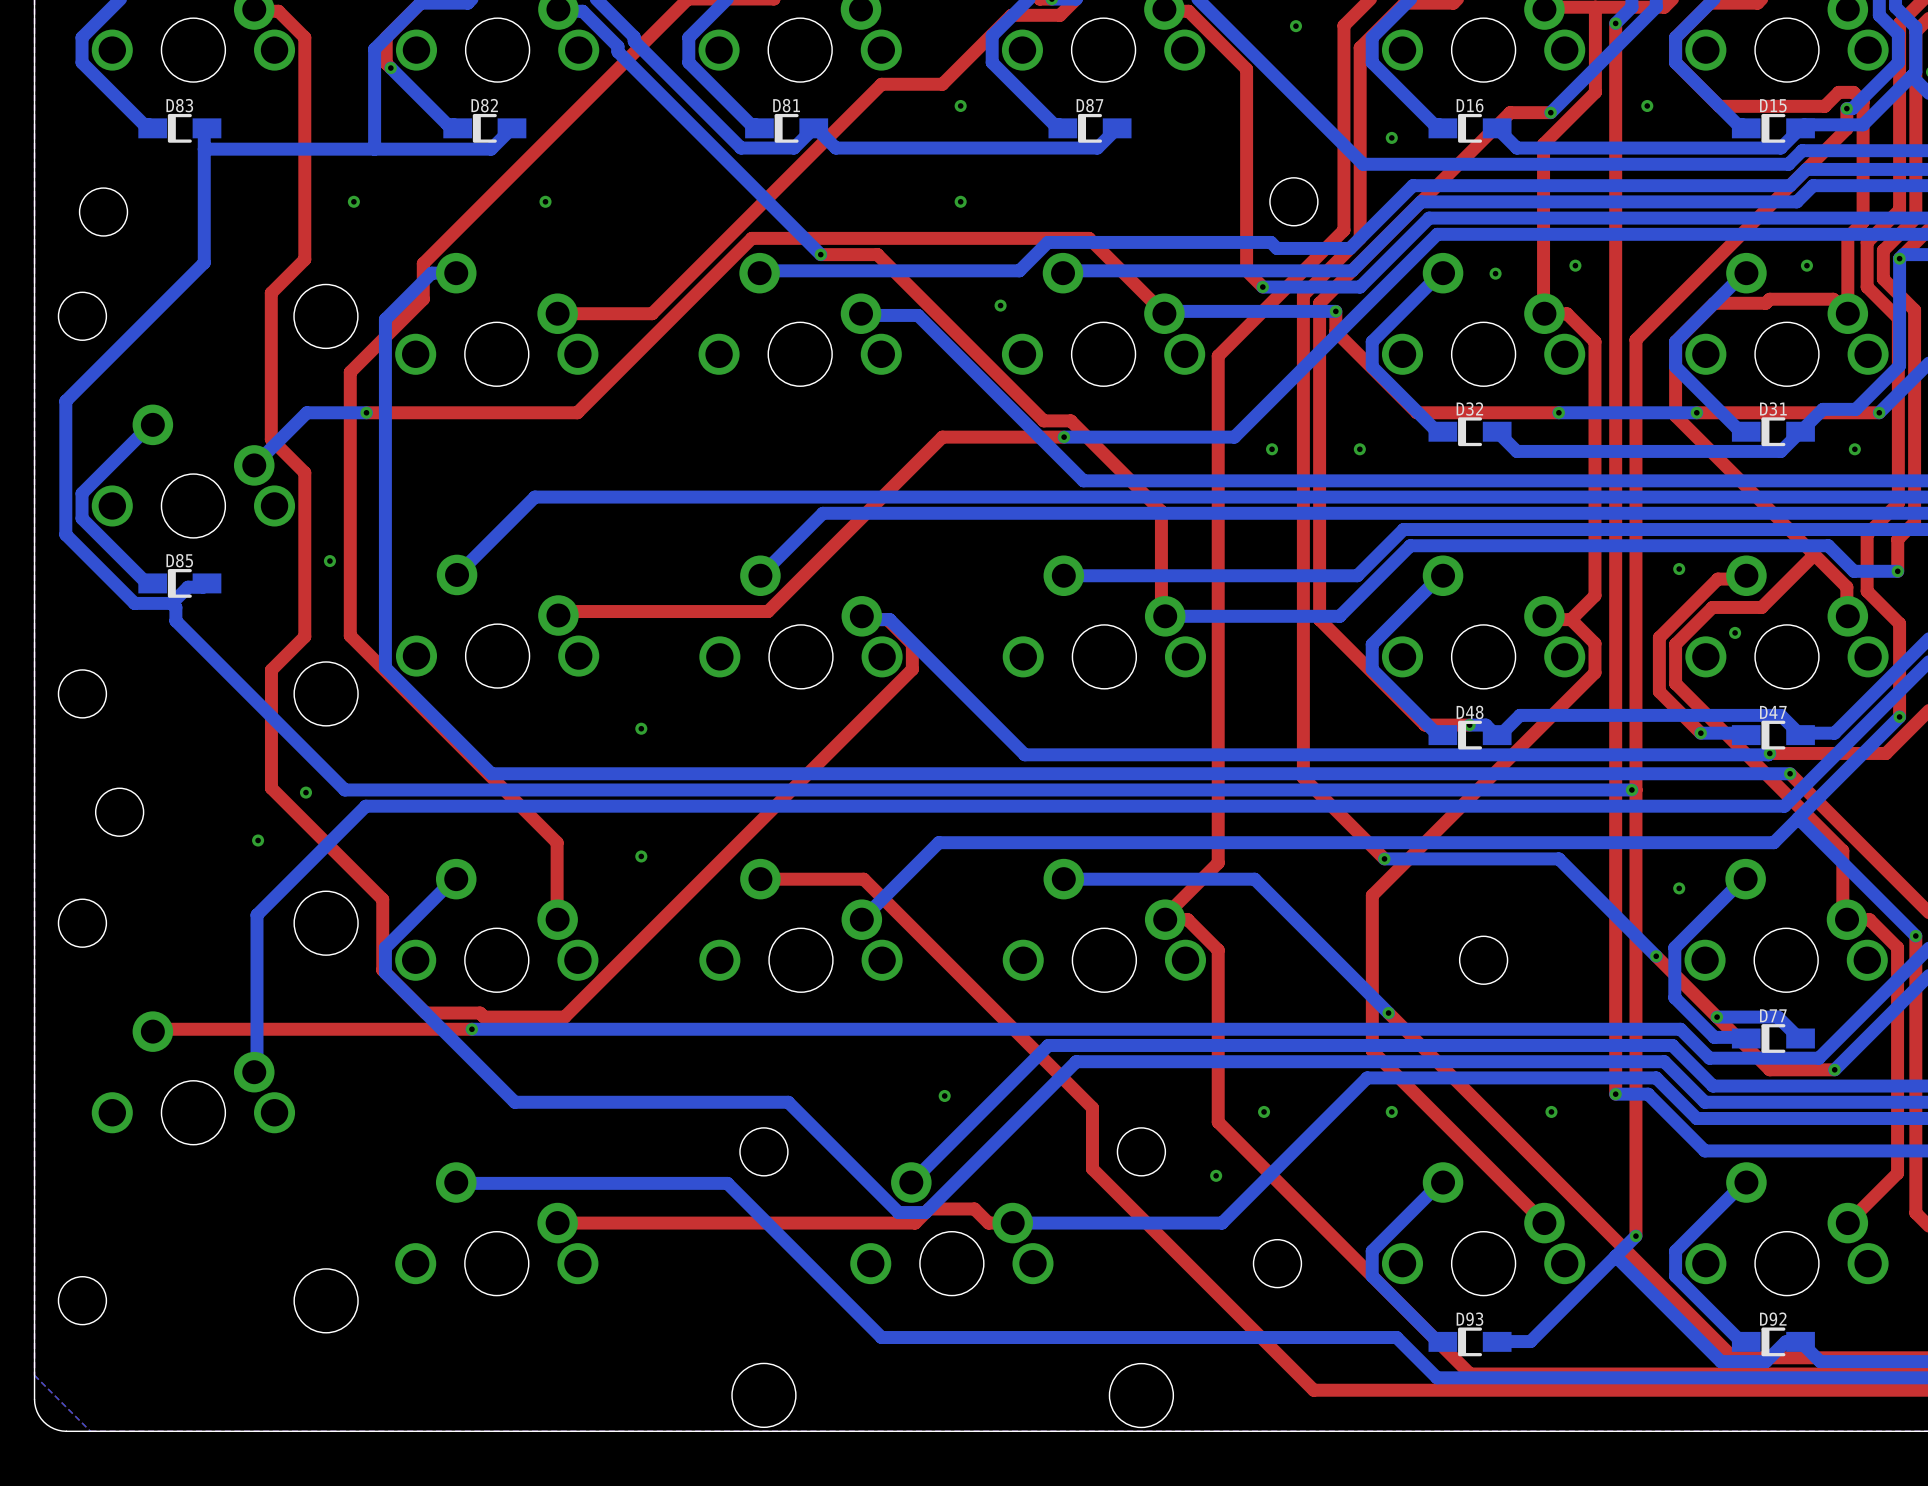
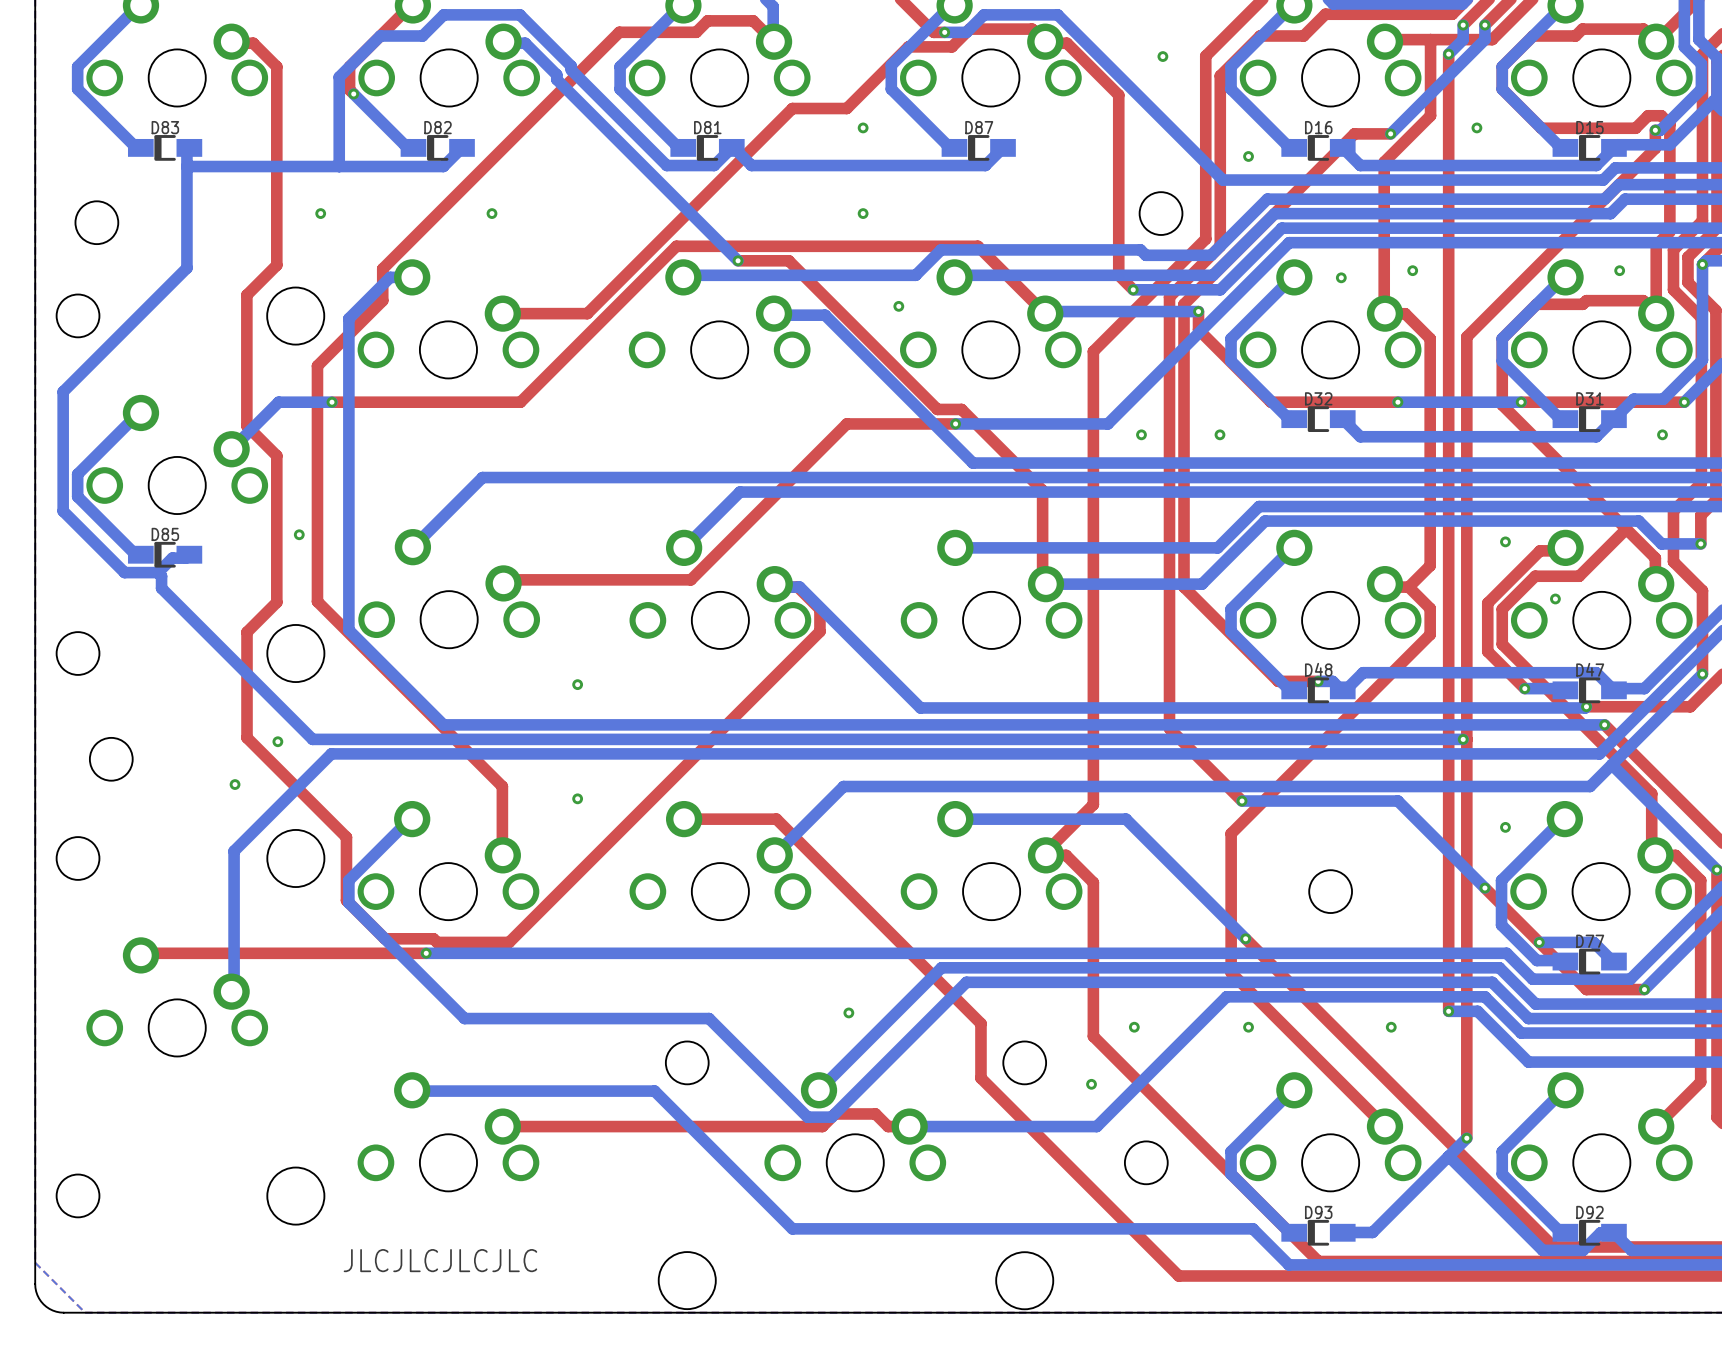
text: none -> JLCJLCJLCJLC (440, 1260)

